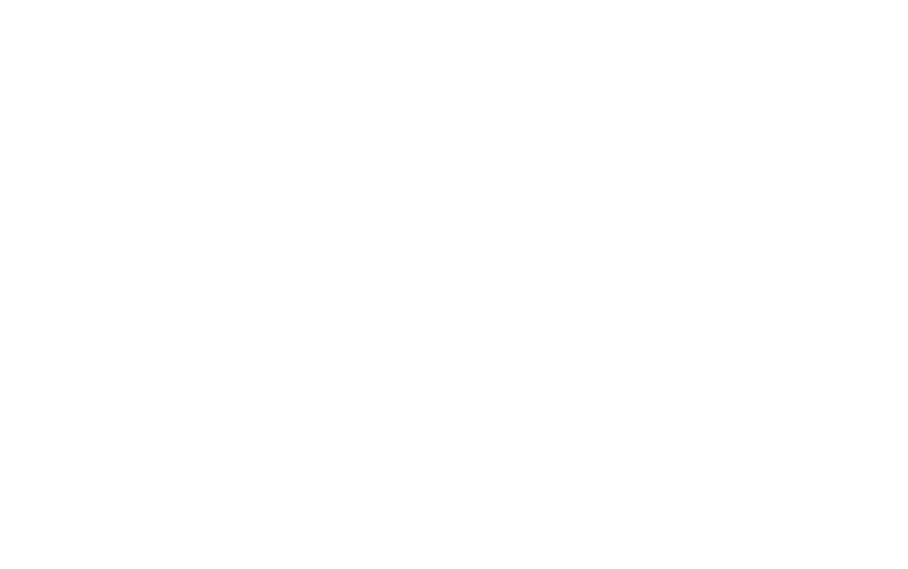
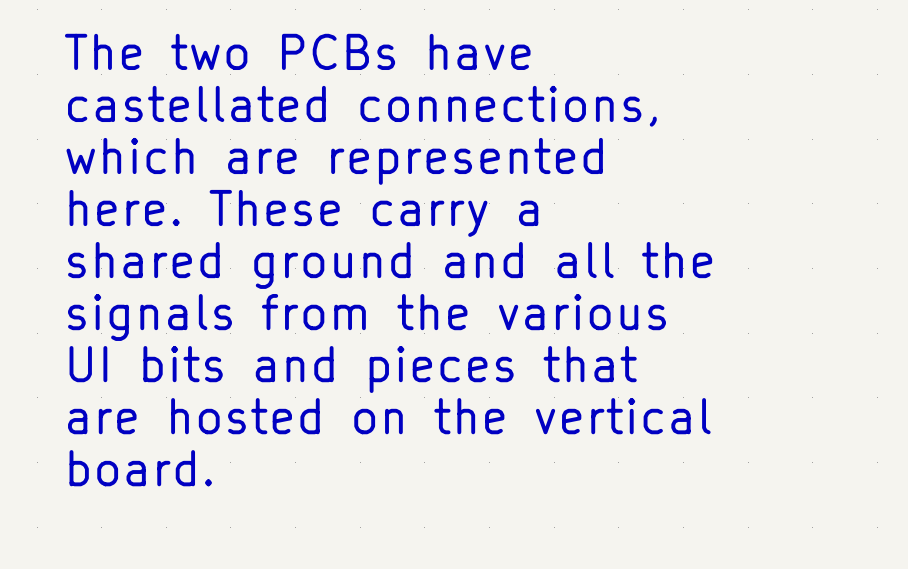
text: none -> The two PCBs have (297, 51)
text: none -> castellated connections, (362, 106)
text: none -> which are represented (334, 161)
text: none -> here. These carry a (303, 213)
text: none -> shared ground and all the (390, 265)
text: none -> signals from the various (367, 317)
text: none -> UI bits and pieces that (353, 369)
text: none -> are hosted on the vertical (389, 416)
text: none -> board. (140, 468)

